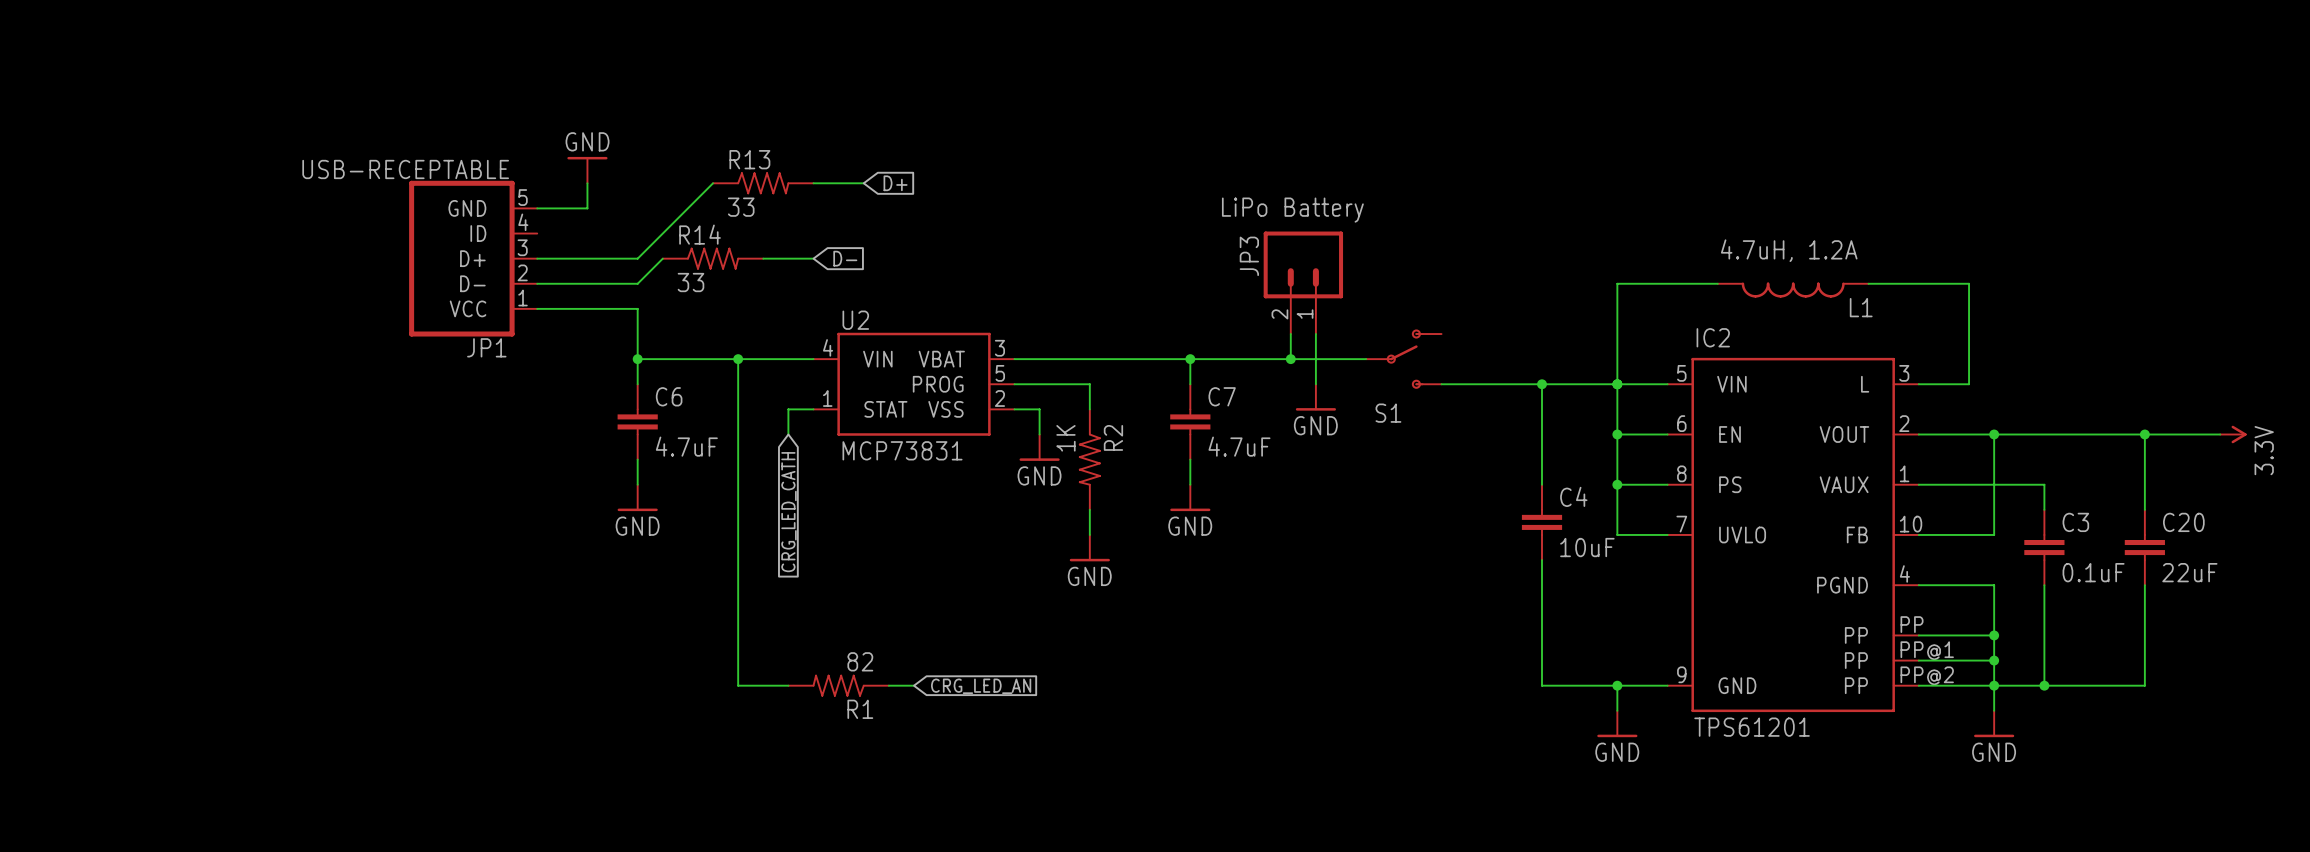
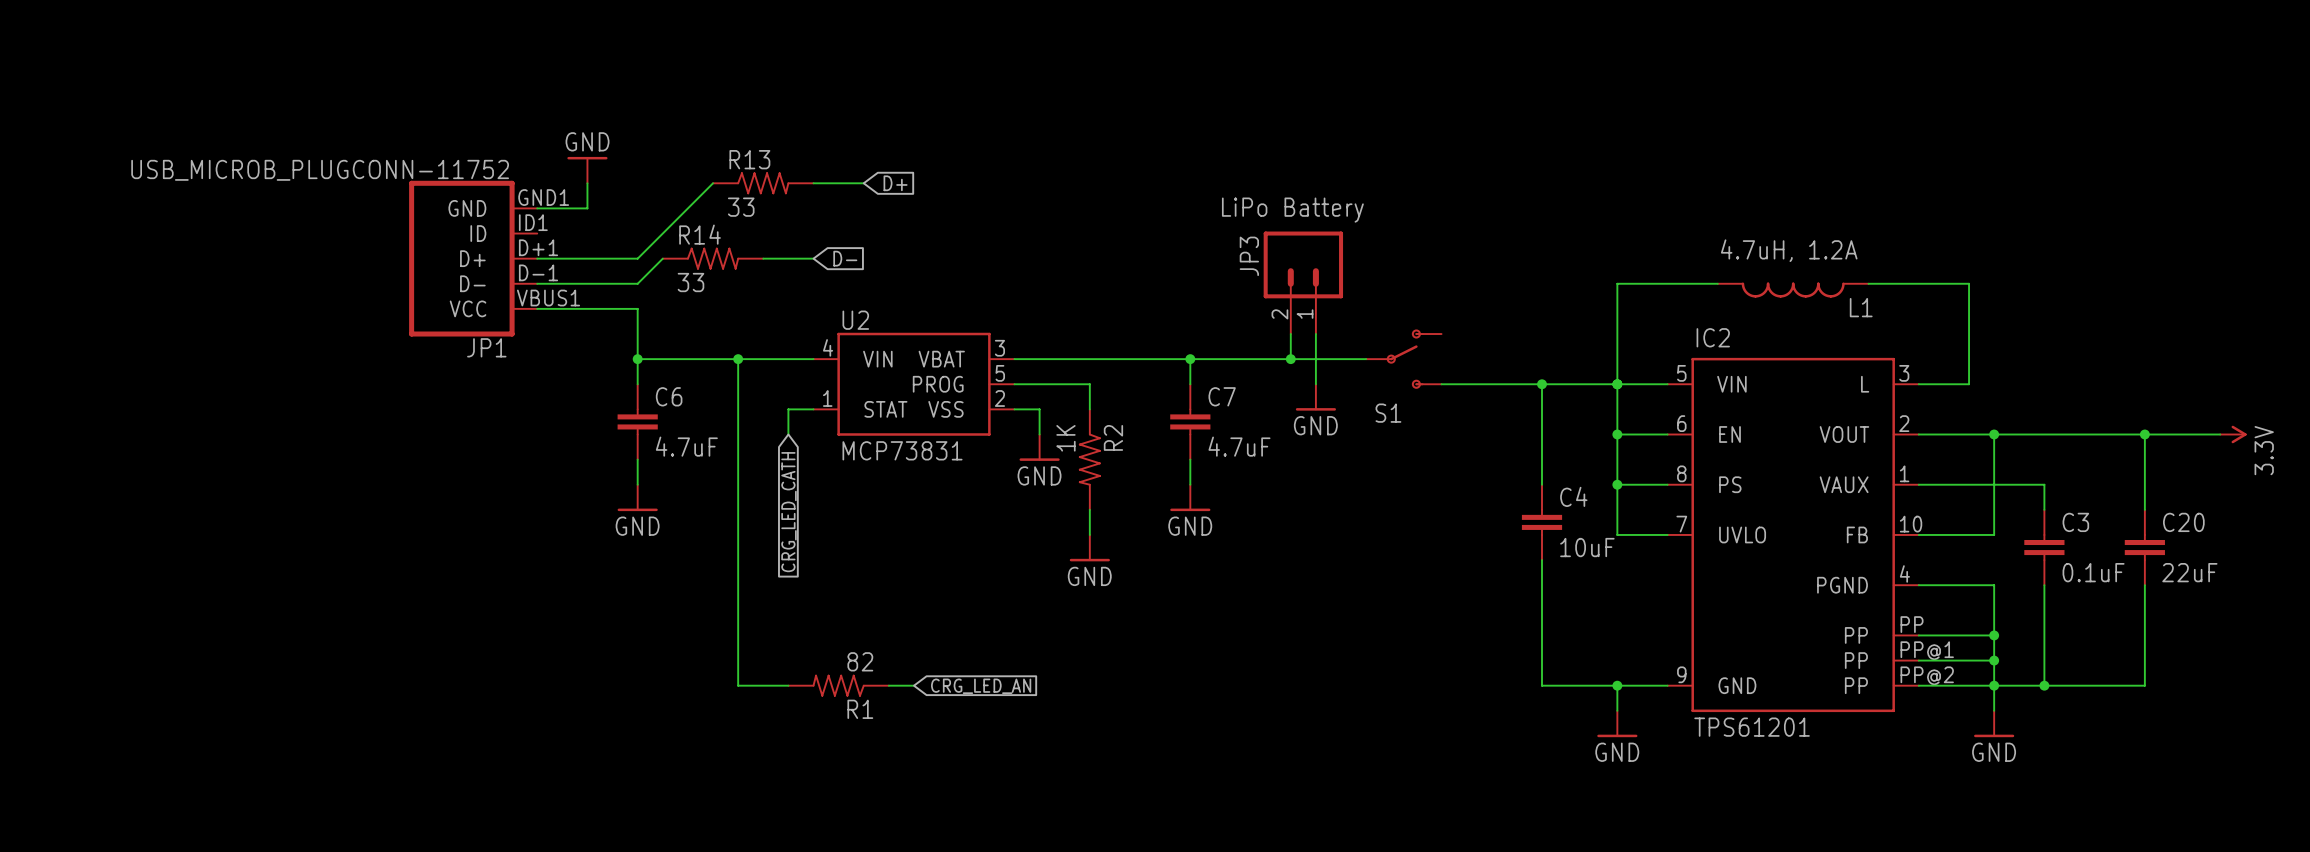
JP1 value: USB-RECEPTABLE (405, 169) -> USB_MICROB_PLUGCONN-11752 (320, 170)
JP1 pin number: 5 (523, 197) -> GND1 (543, 197)
JP1 pin number: 4 (523, 222) -> ID1 (533, 222)
JP1 pin number: 3 (522, 247) -> D+1 (538, 247)
JP1 pin number: 2 (522, 272) -> D-1 (538, 272)
JP1 pin number: 1 (523, 298) -> VBUS1 (548, 298)

